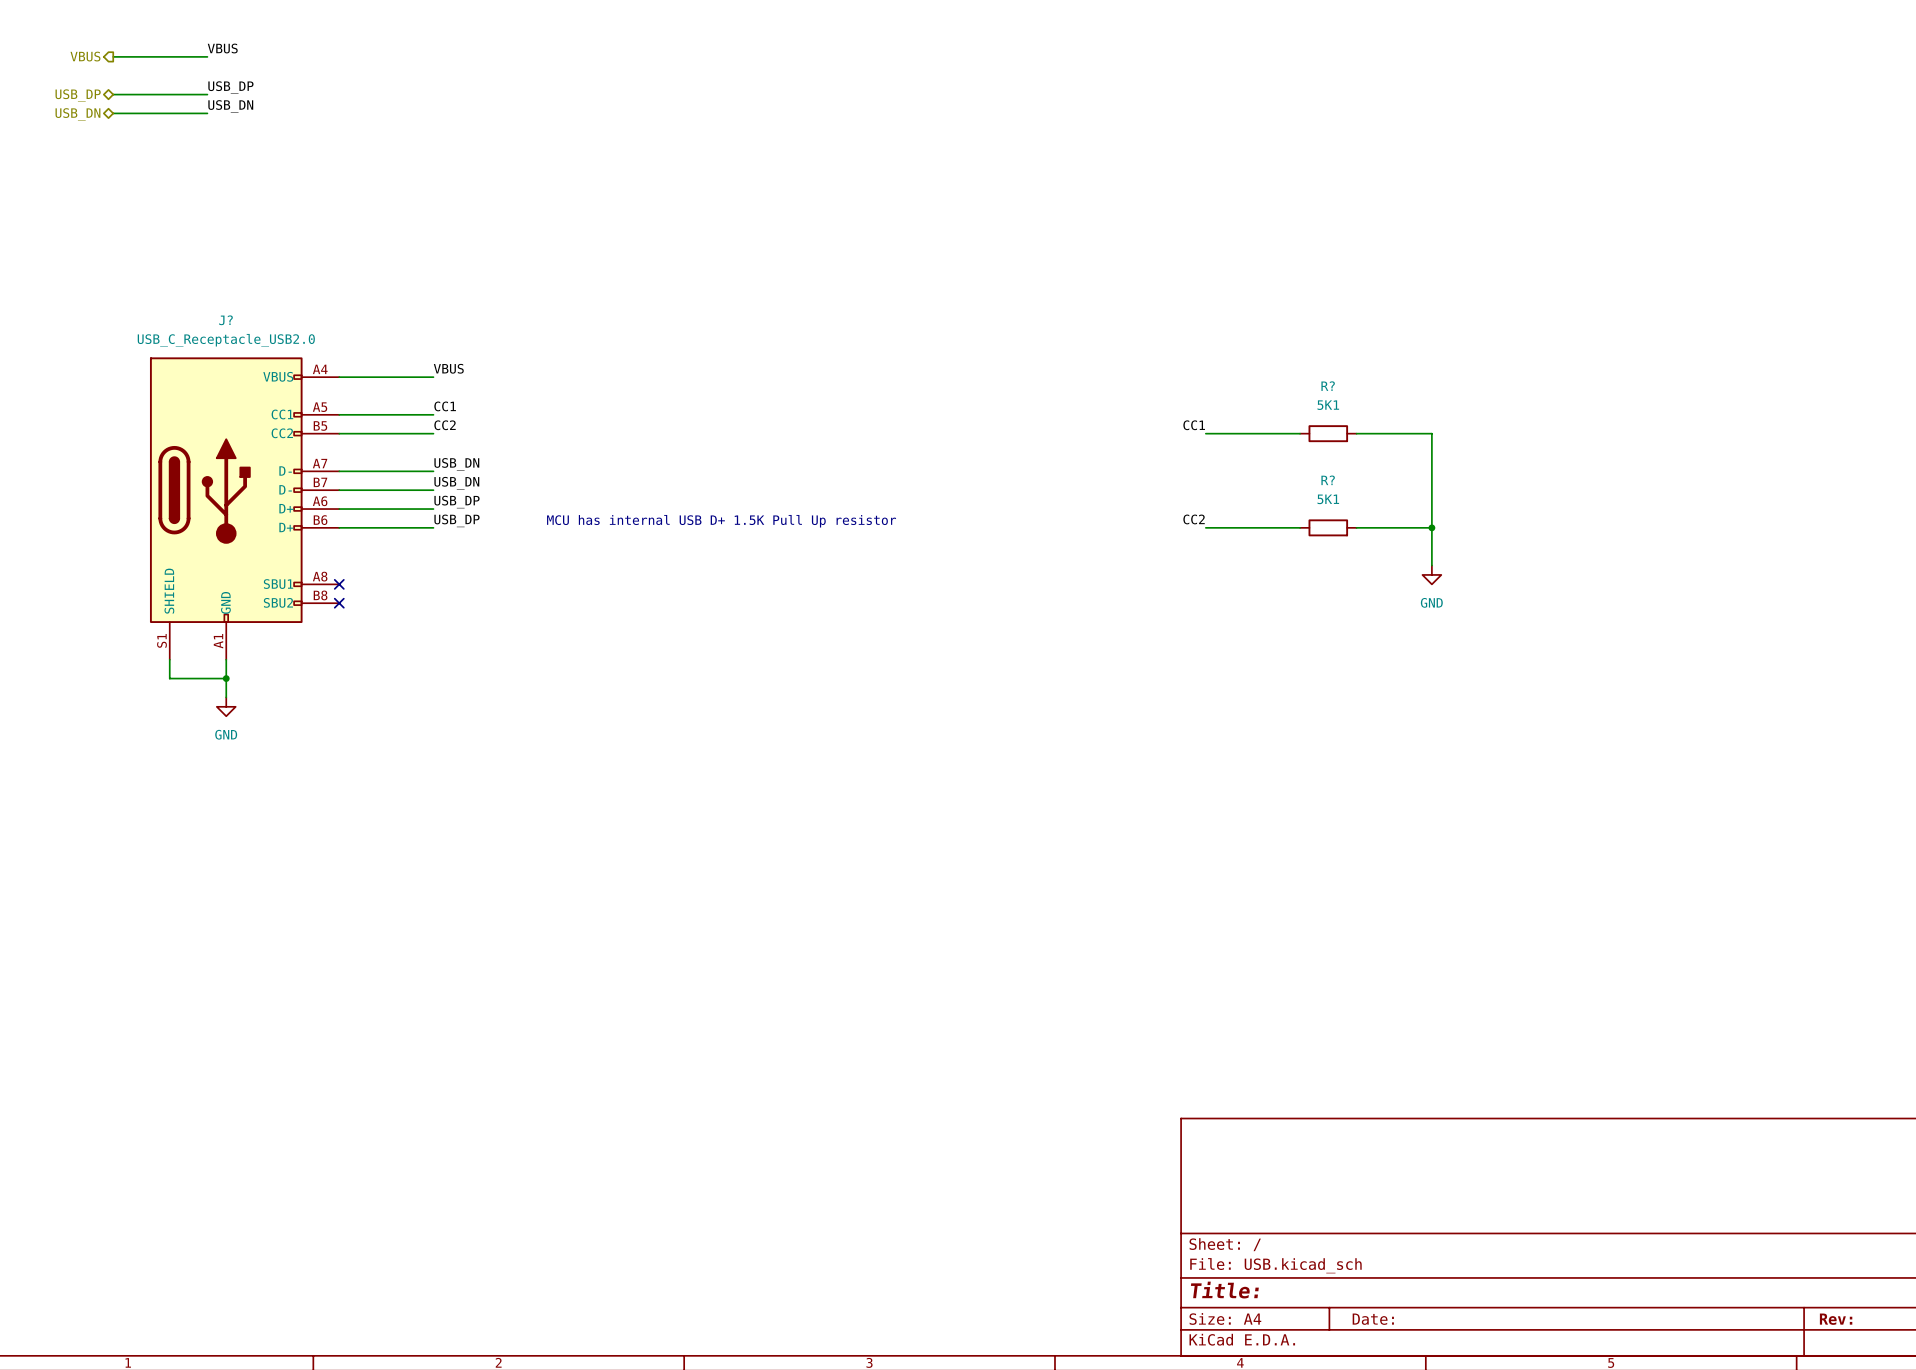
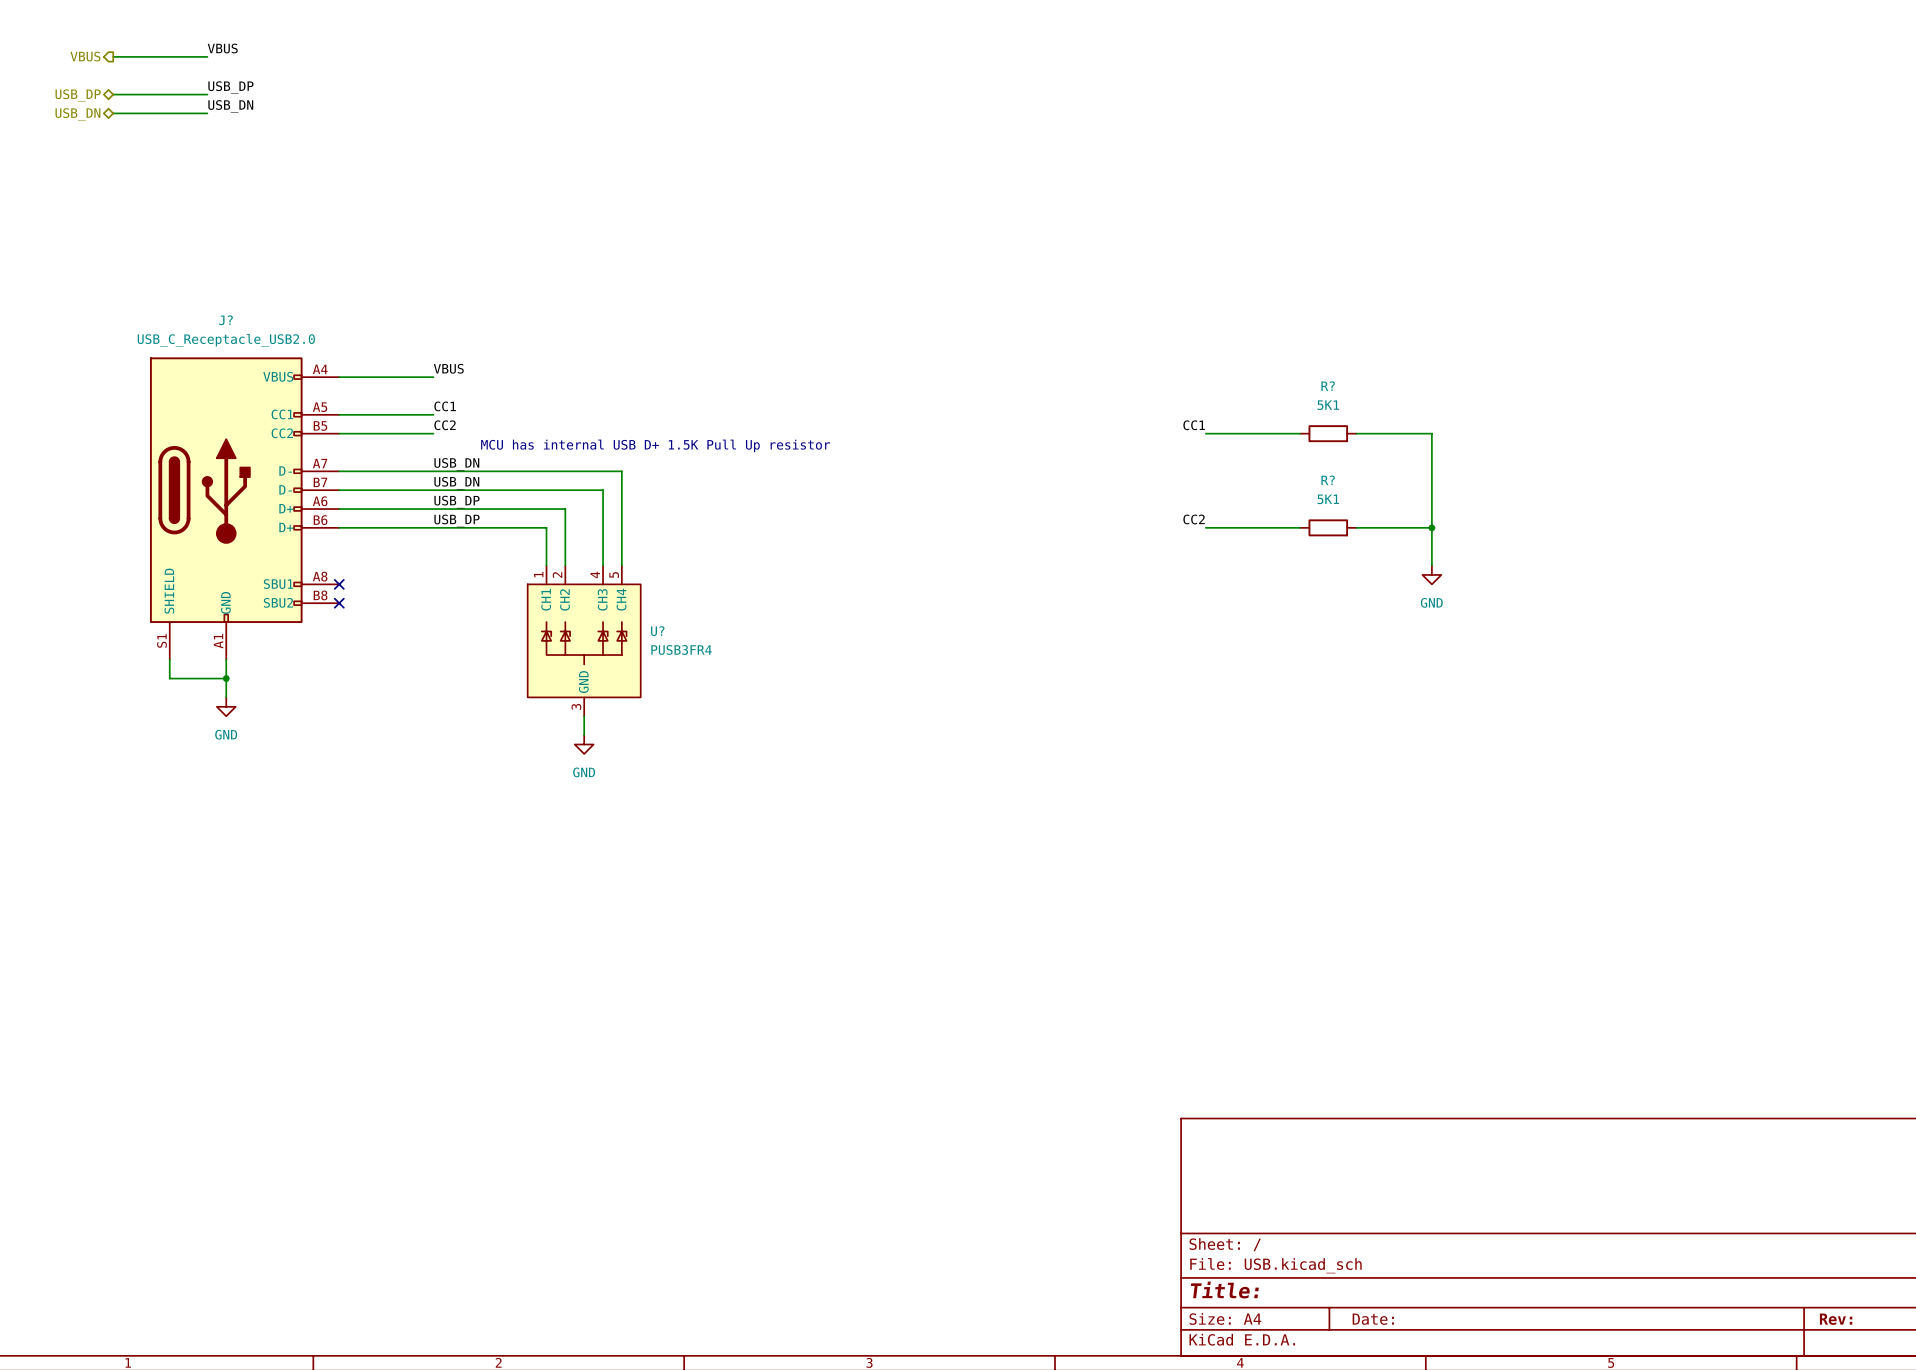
wire: none -> (433, 471) (621, 471) (621, 565)
wire: none -> (433, 490) (603, 490) (603, 565)
wire: none -> (433, 509) (565, 509) (565, 565)
text position: MCU has internal USB D+ 1.5K Pull Up resistor (721, 521) -> MCU has internal USB D+ 1.5K Pull Up resistor (655, 445)
wire: none -> (433, 527) (546, 527) (546, 565)
U?: none -> PUSB3FR4 (584, 640)
wire: none -> (584, 716) (584, 735)
power symbol: none -> GND (584, 744)

